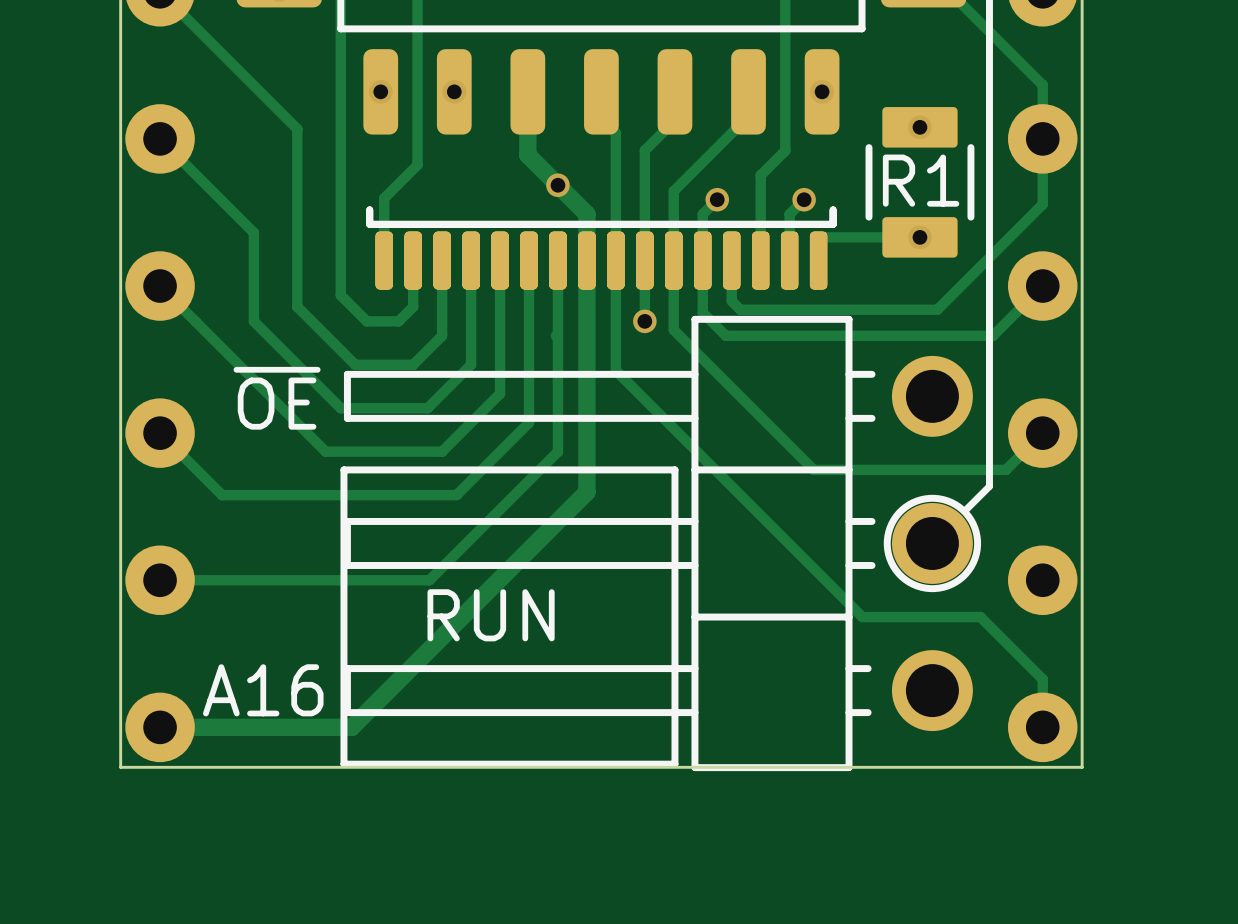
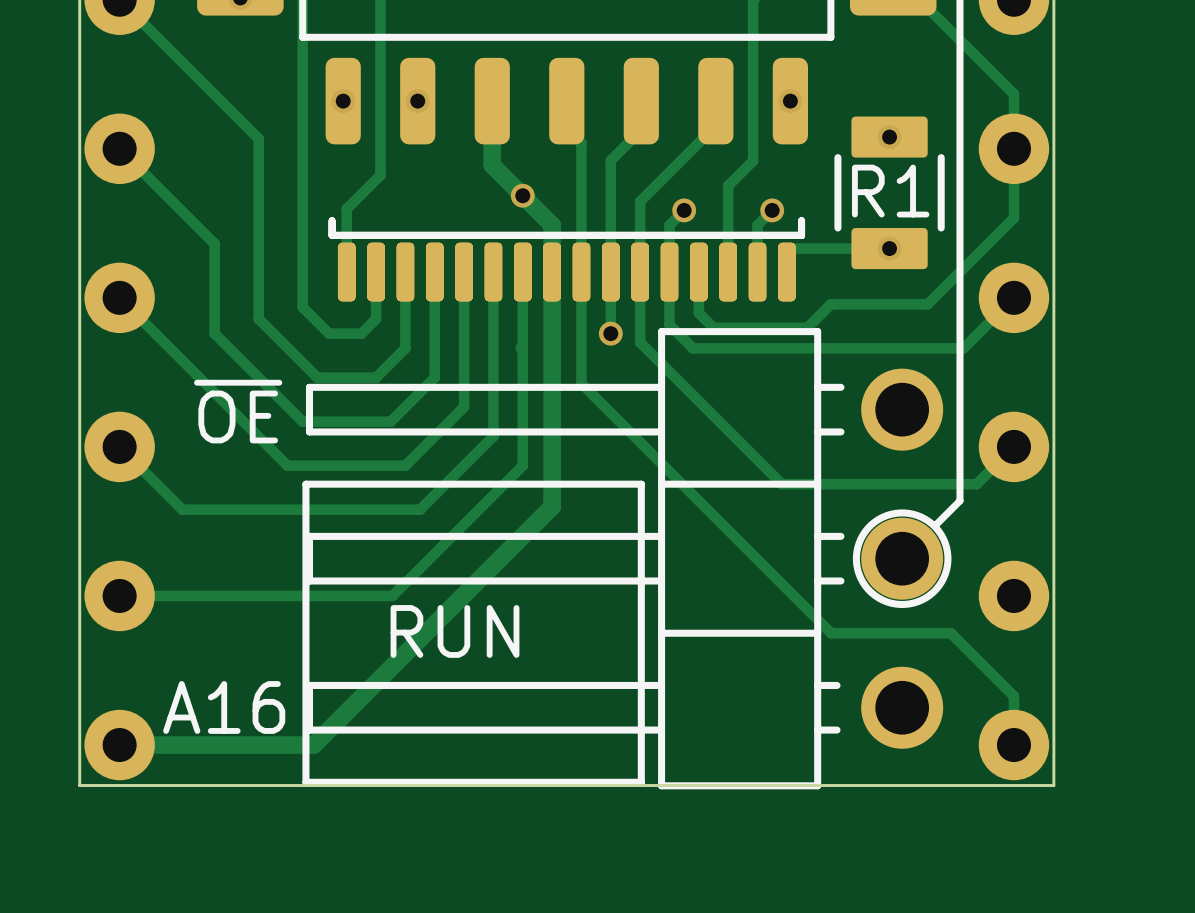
track: (1042, 204) (937, 309) (740, 309) -> (1013, 215) (1013, 218) (927, 304) (830, 304) (807, 327) (713, 327) (707, 321)

